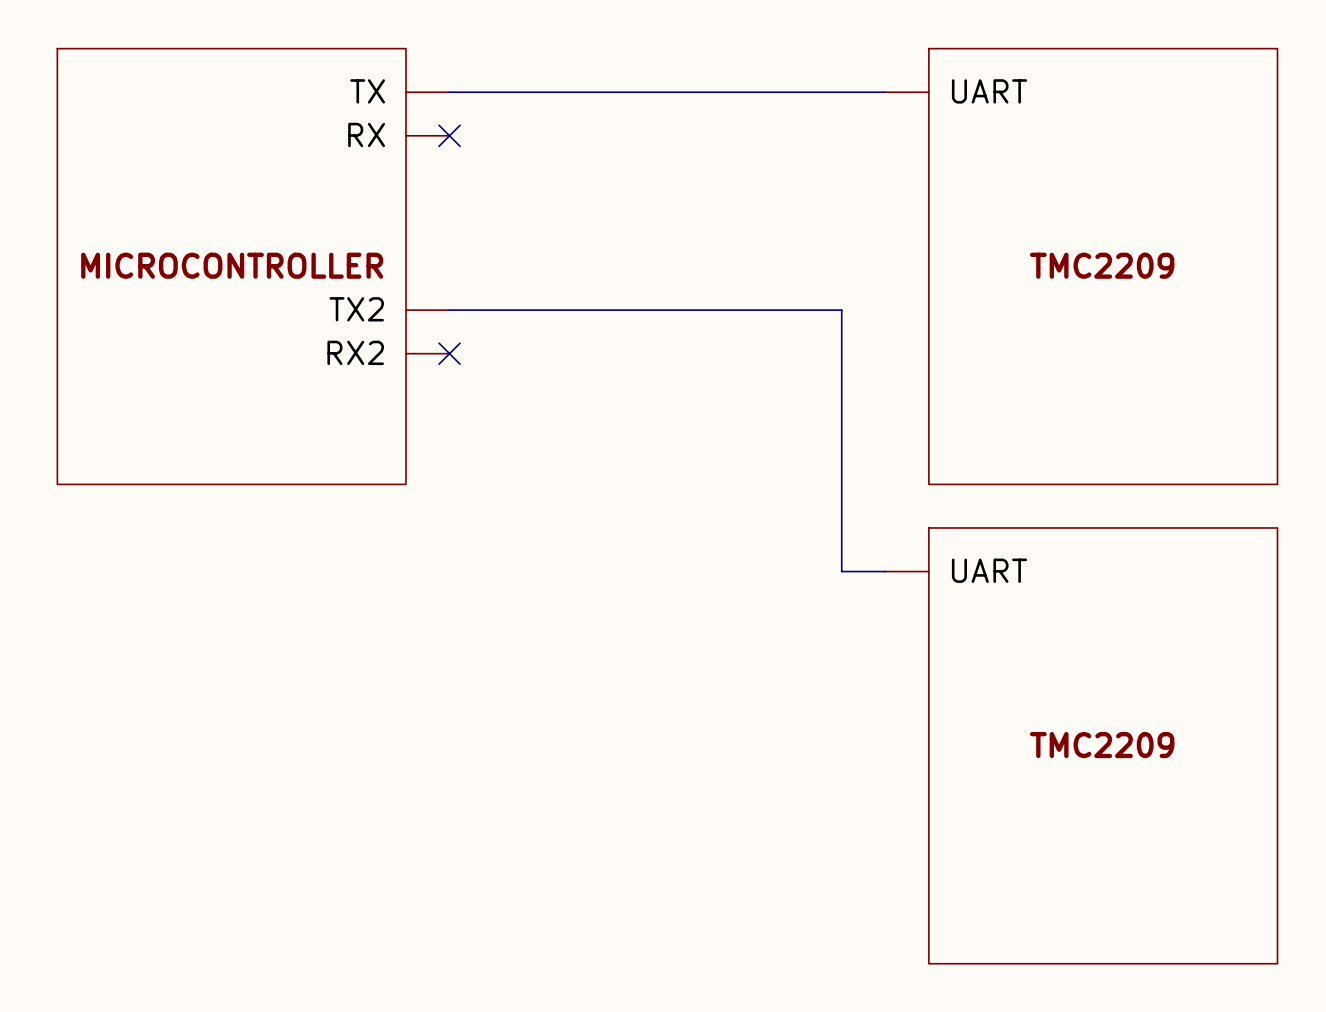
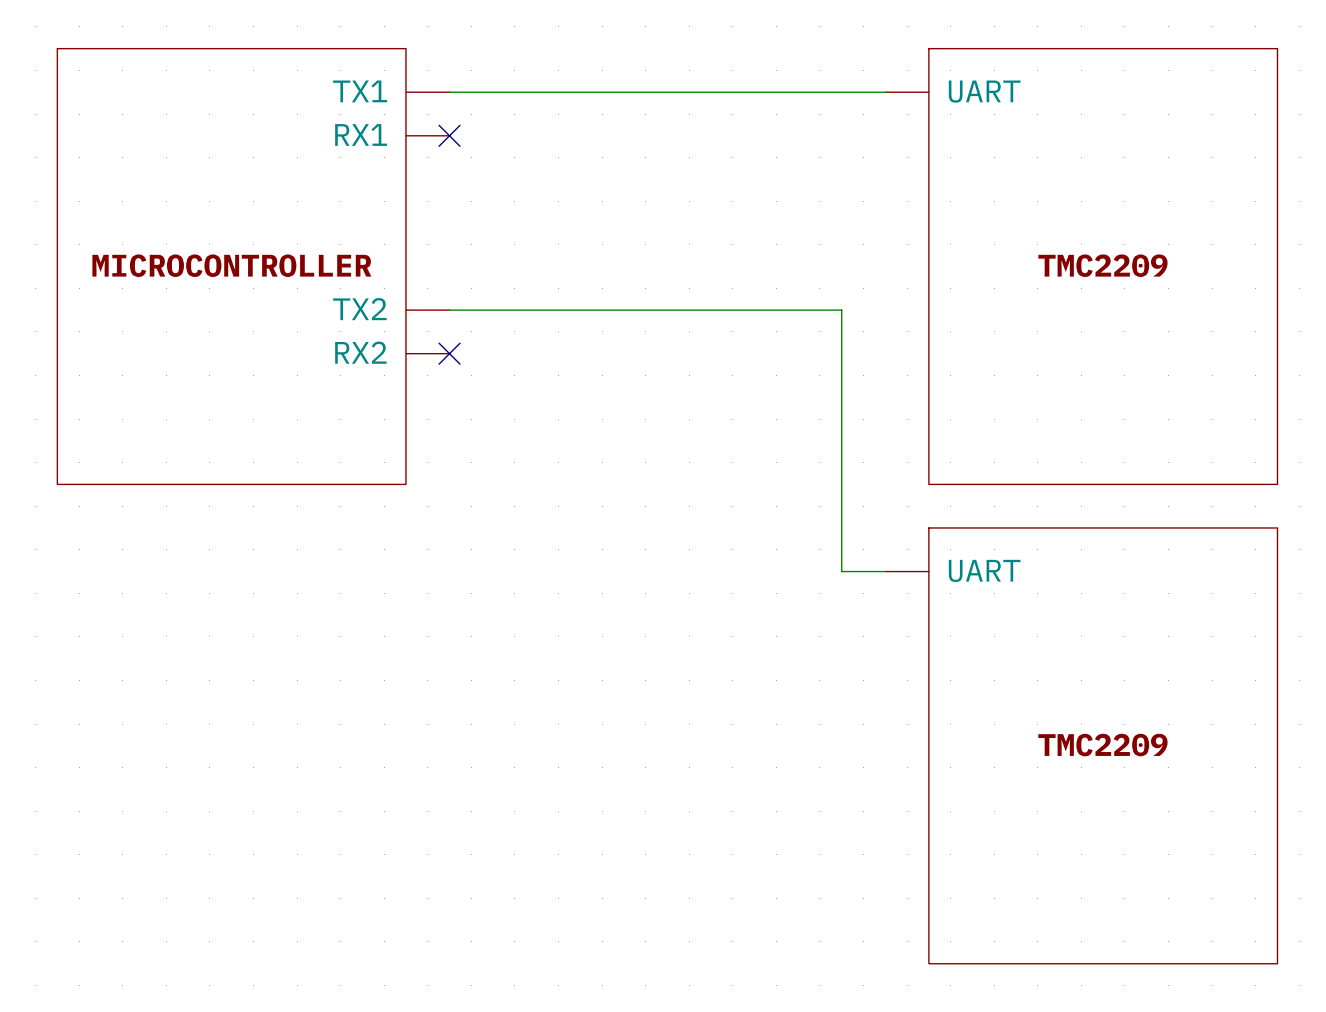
part pin name: TX (367, 91) -> TX1 (360, 91)
part pin name: RX (366, 134) -> RX1 (361, 134)

